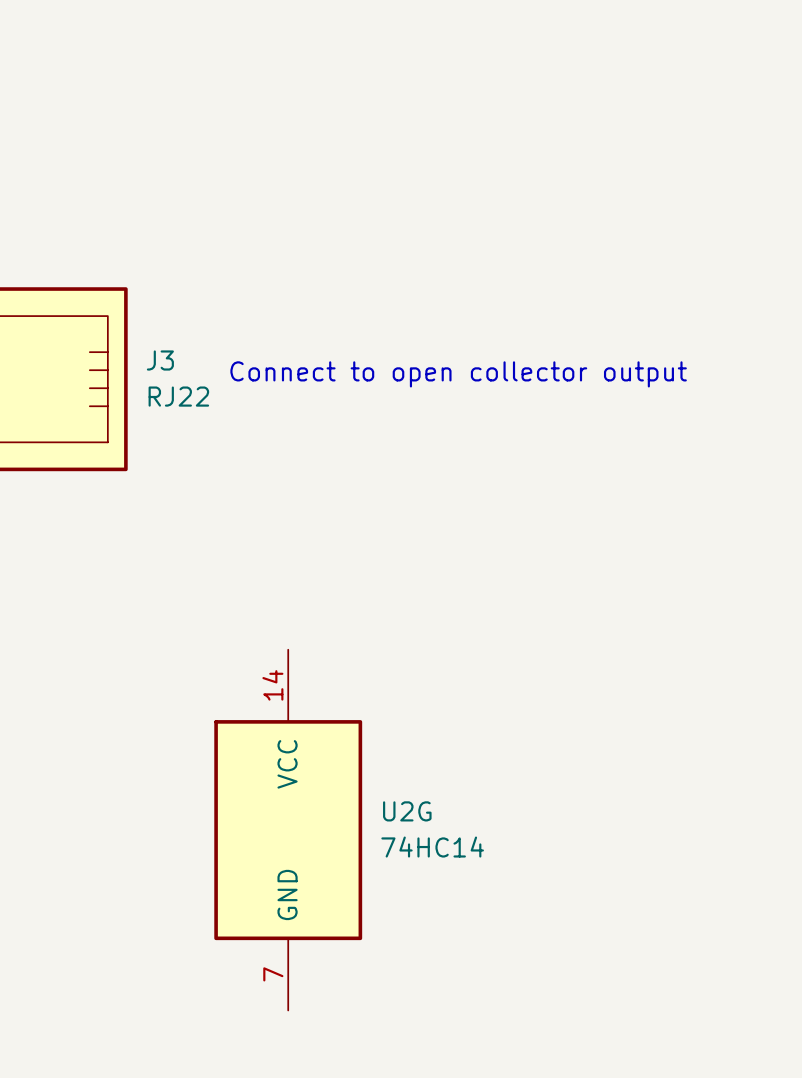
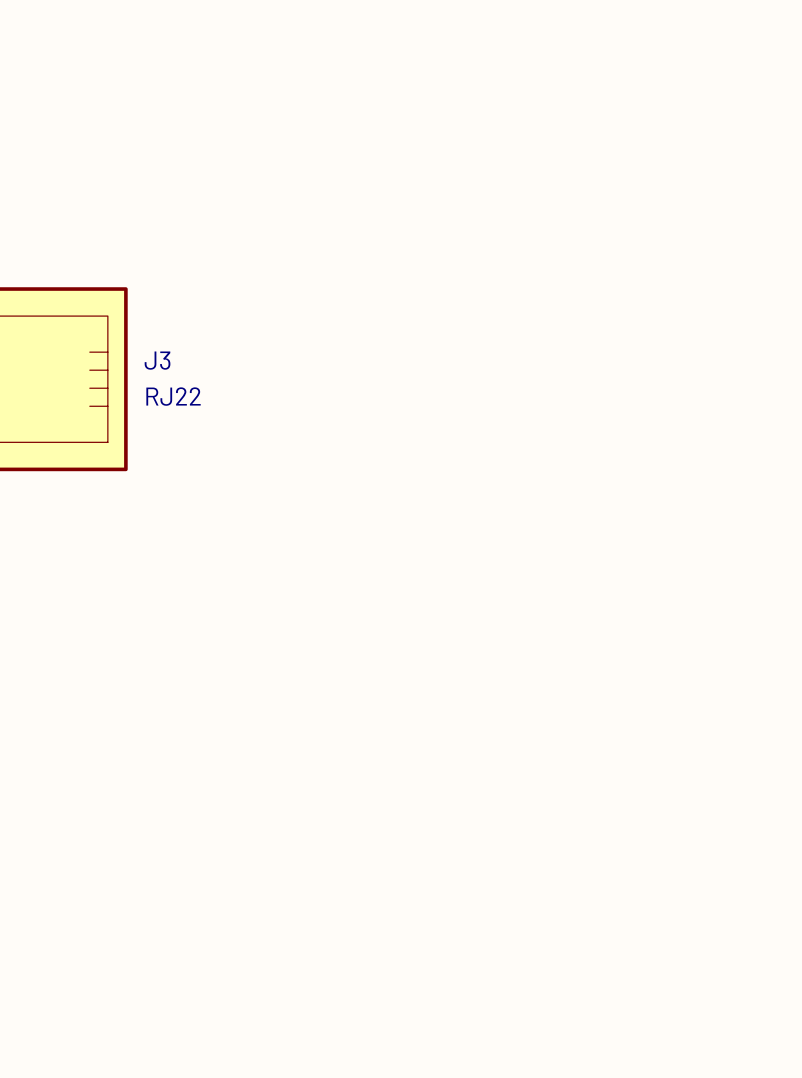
text: Connect to open collector output (458, 374) -> none
U2G: 74HC14 (288, 830) -> none

